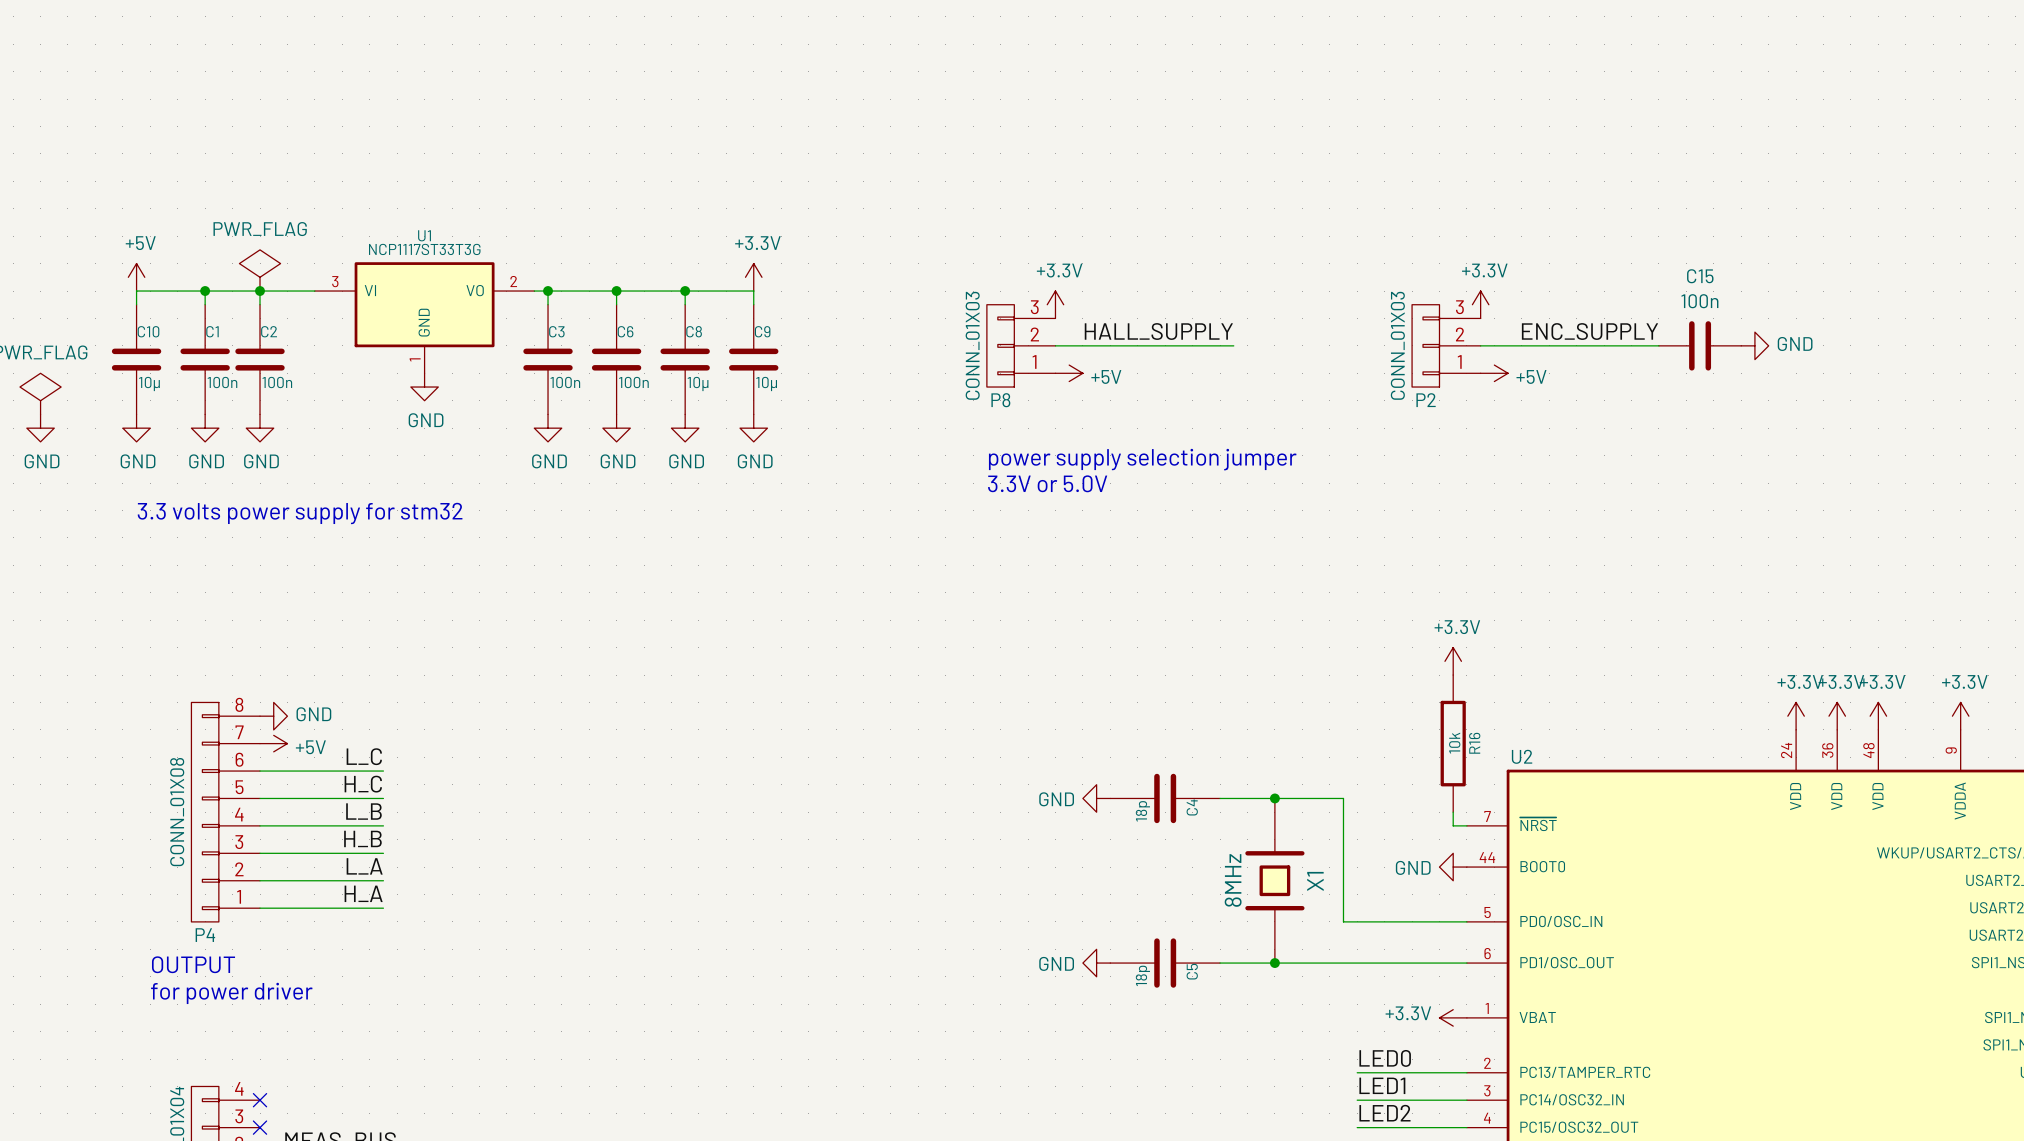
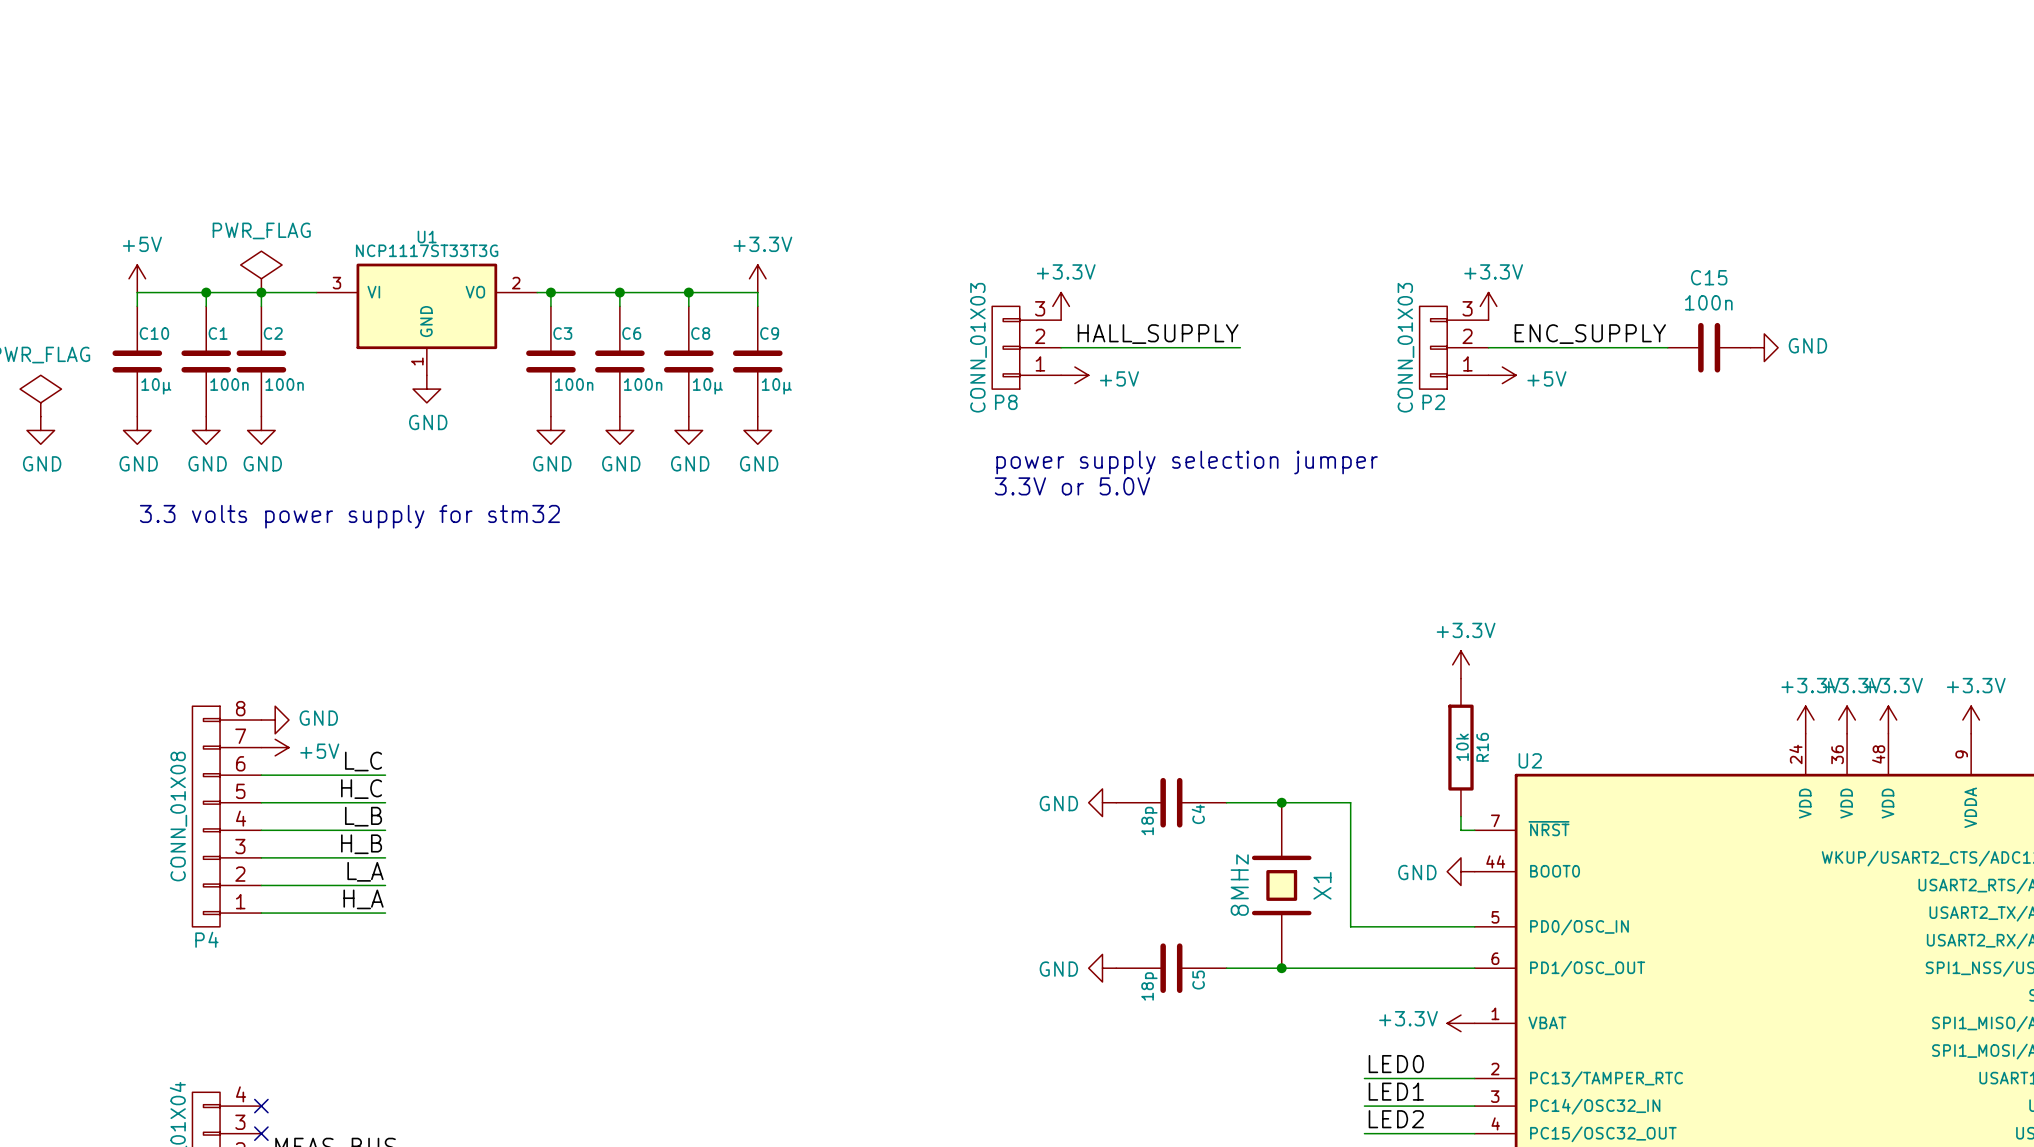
text: OUTPUT (193, 964) -> none
text: for power driver (231, 993) -> none

